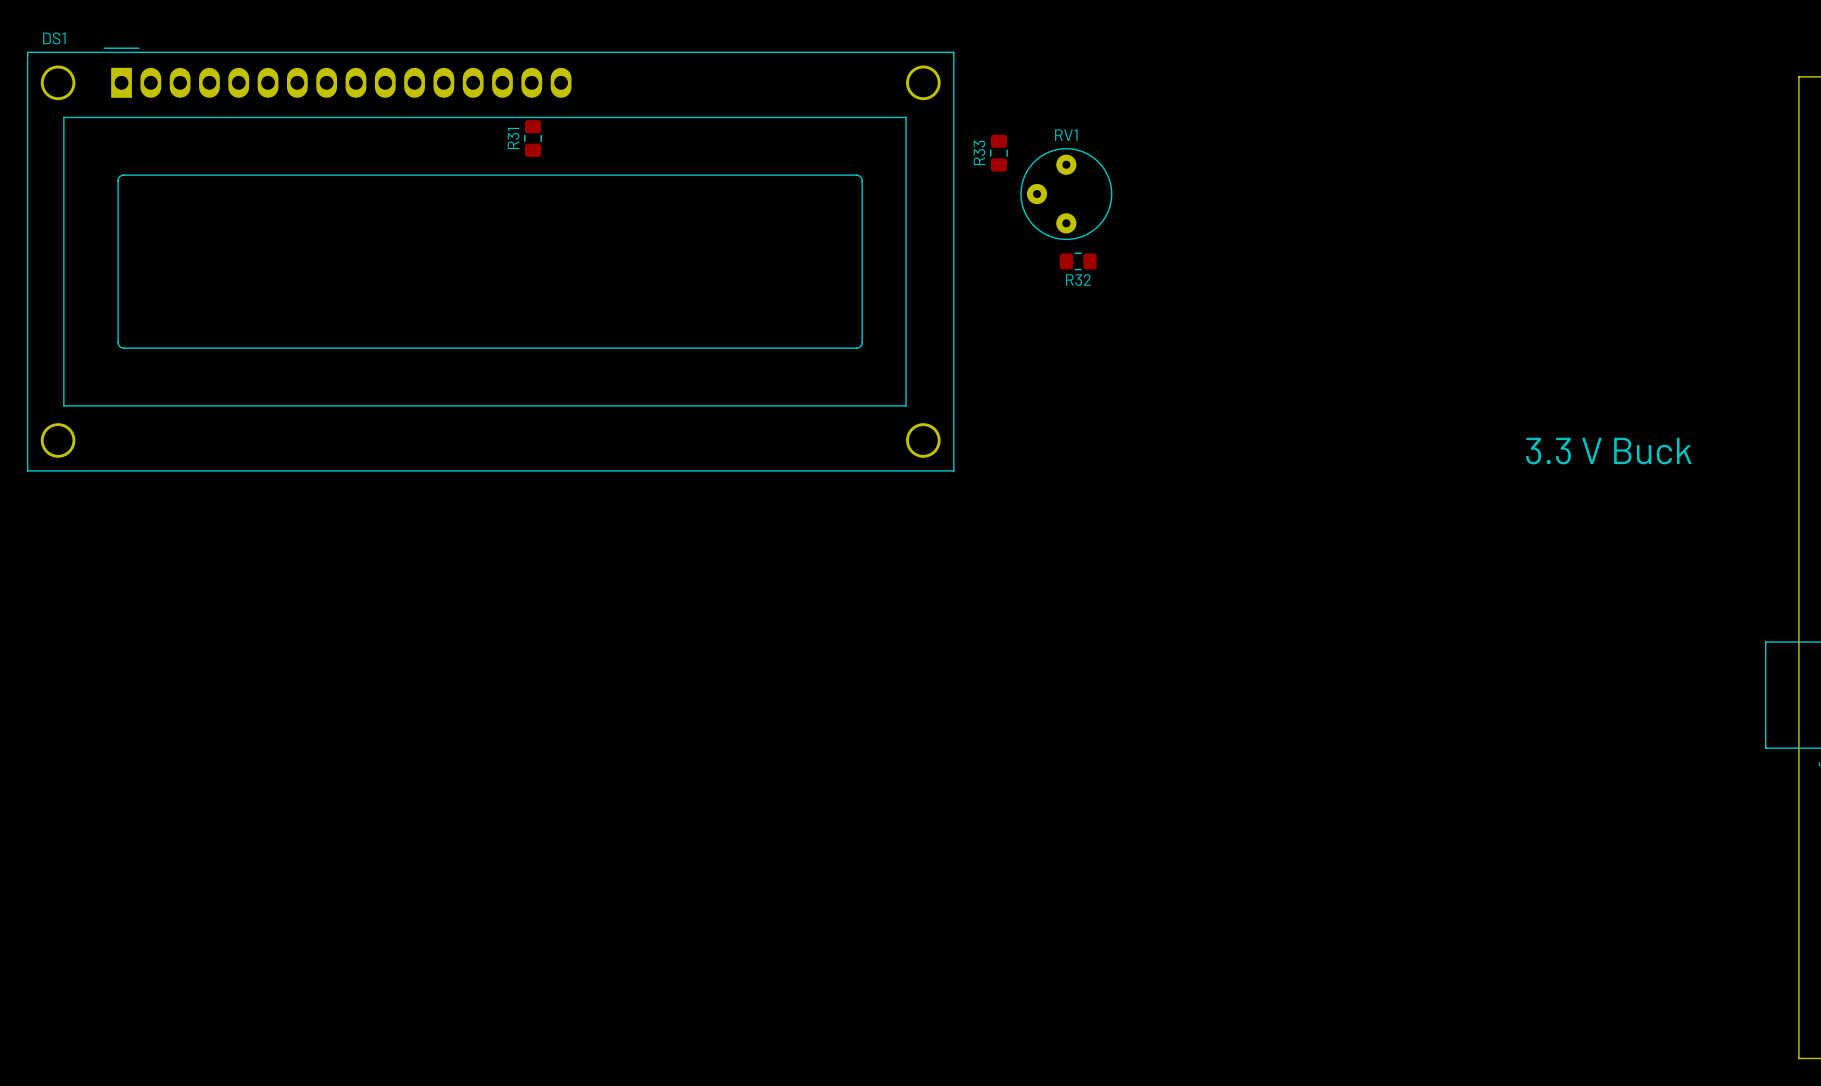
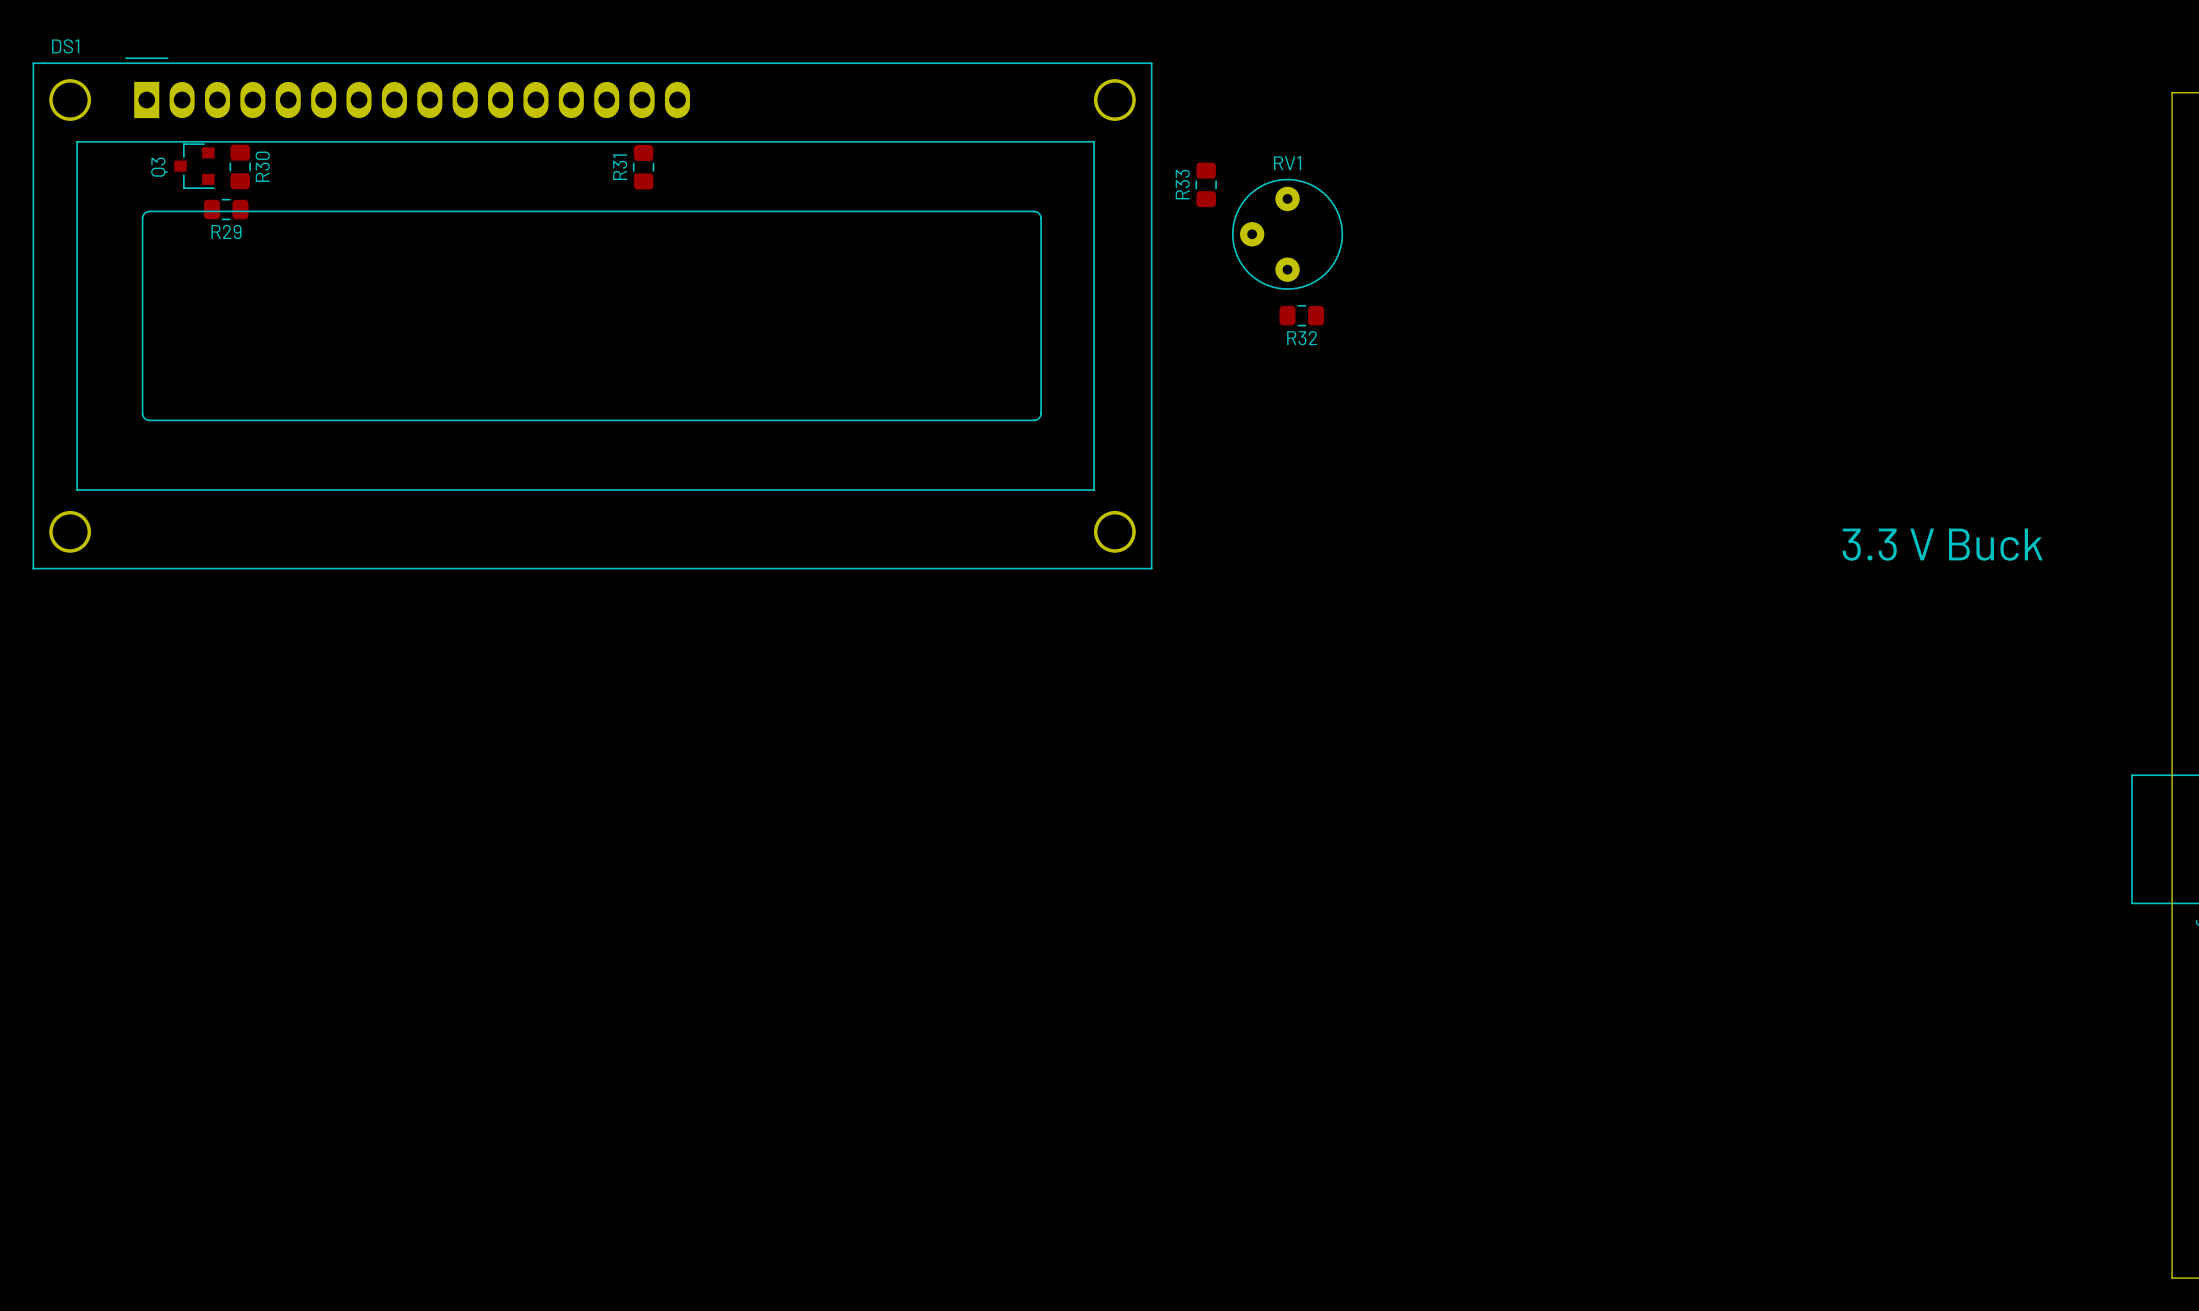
Q3: none -> (194, 166)
R30: none -> (240, 166)
R29: none -> (226, 209)

